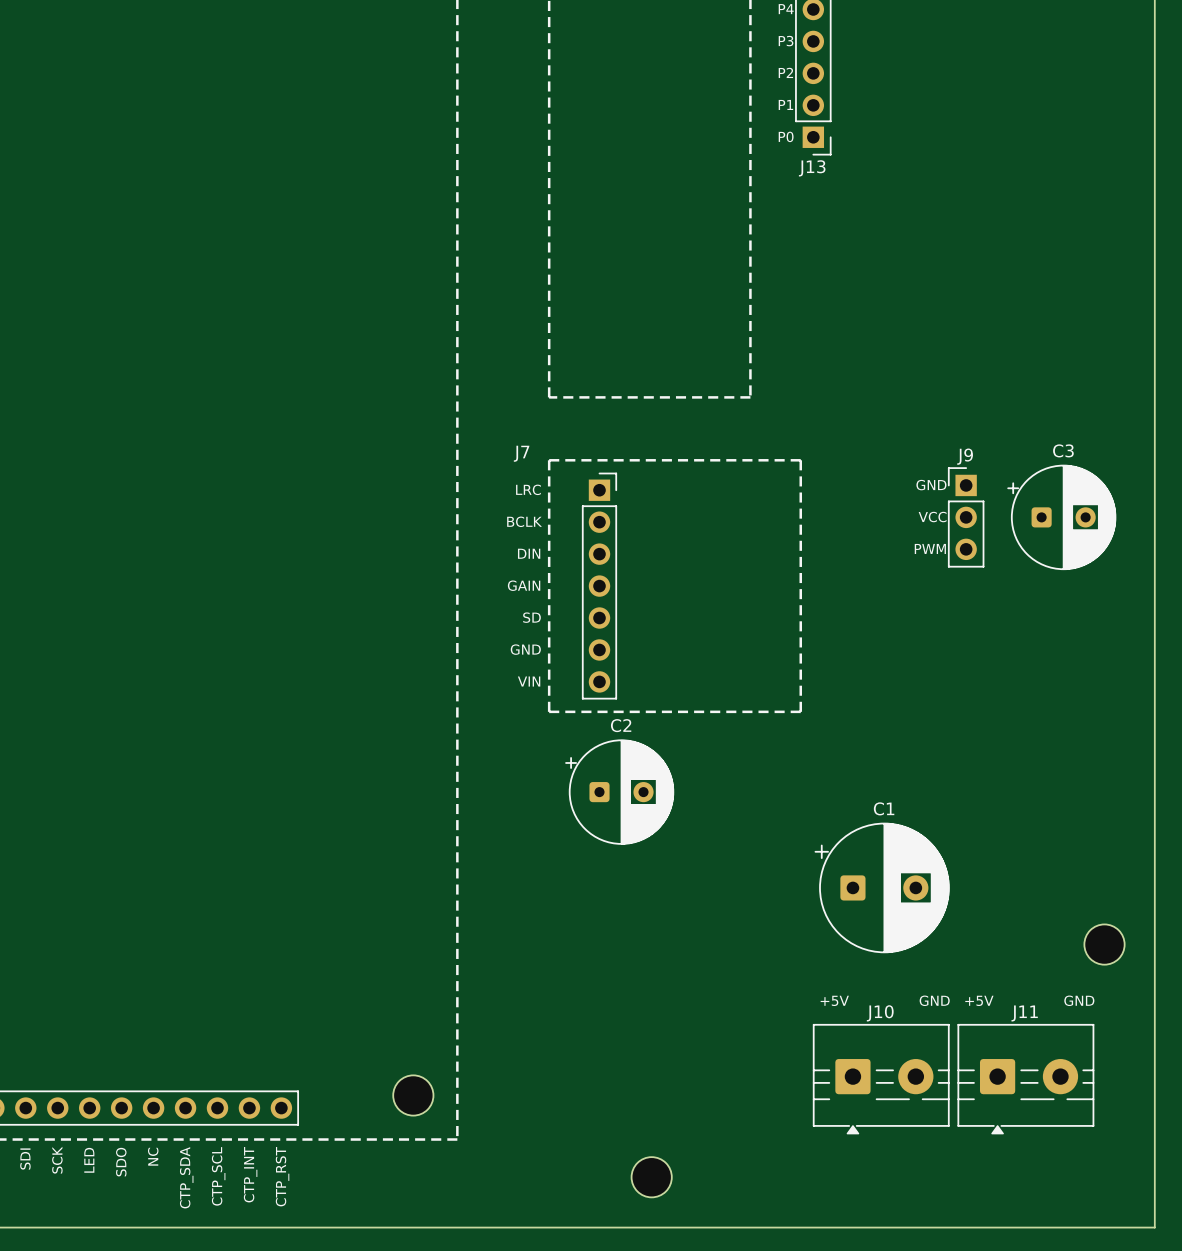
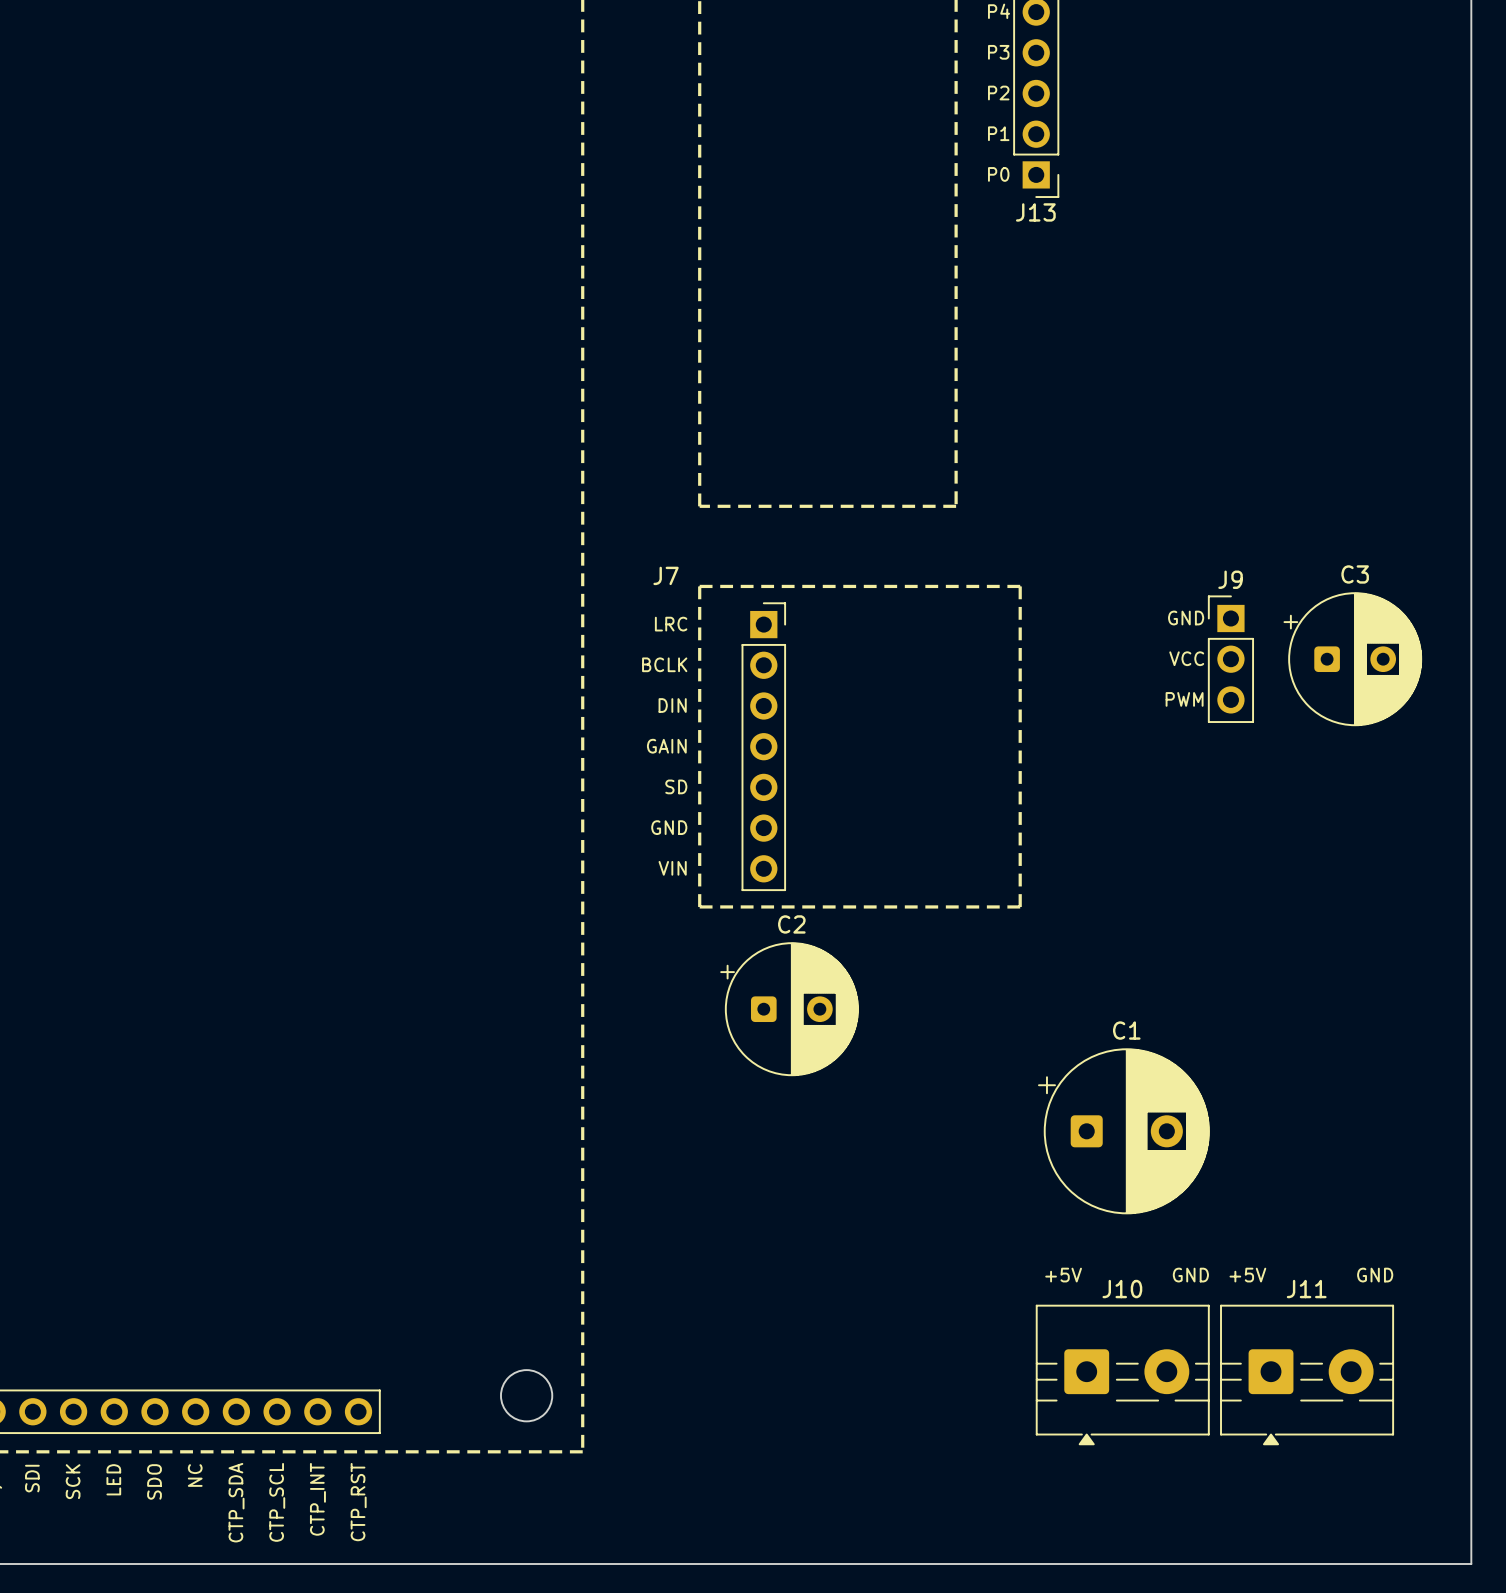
part: (1104, 944) -> none
part: (651, 1177) -> none

